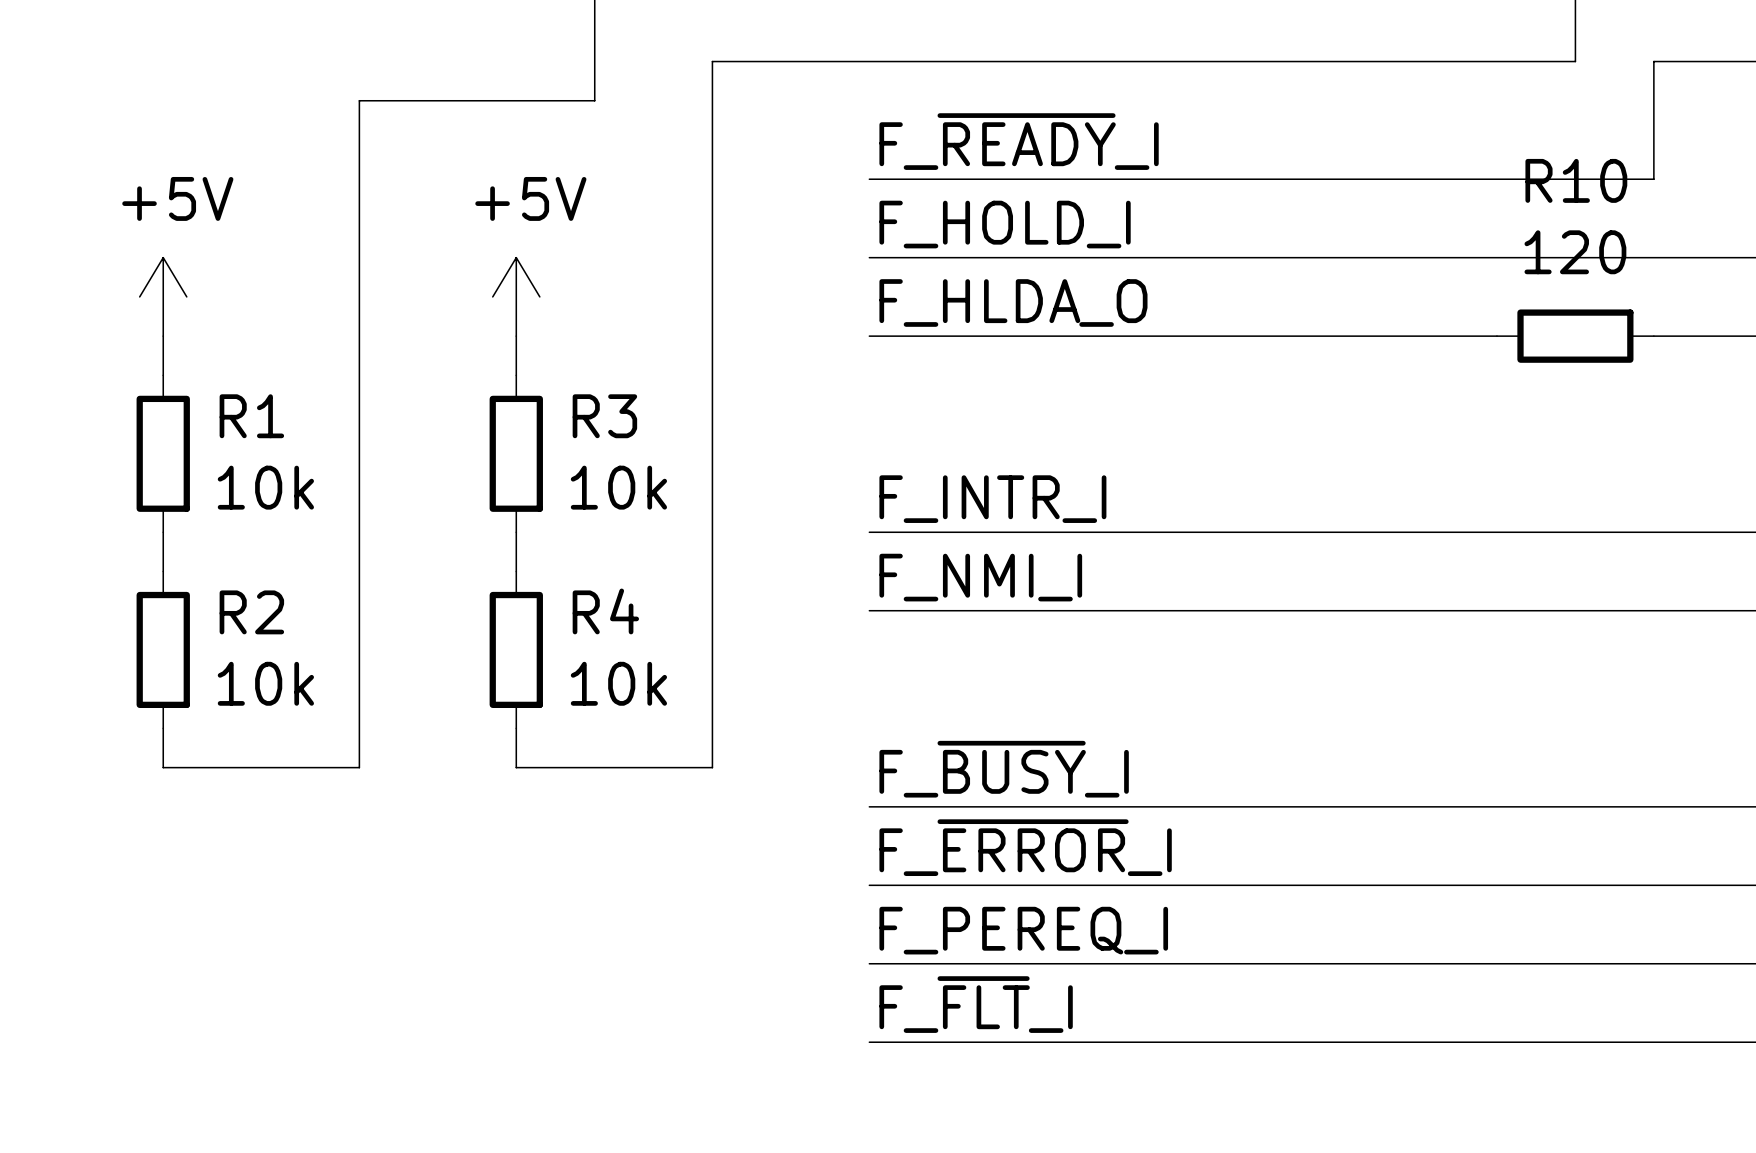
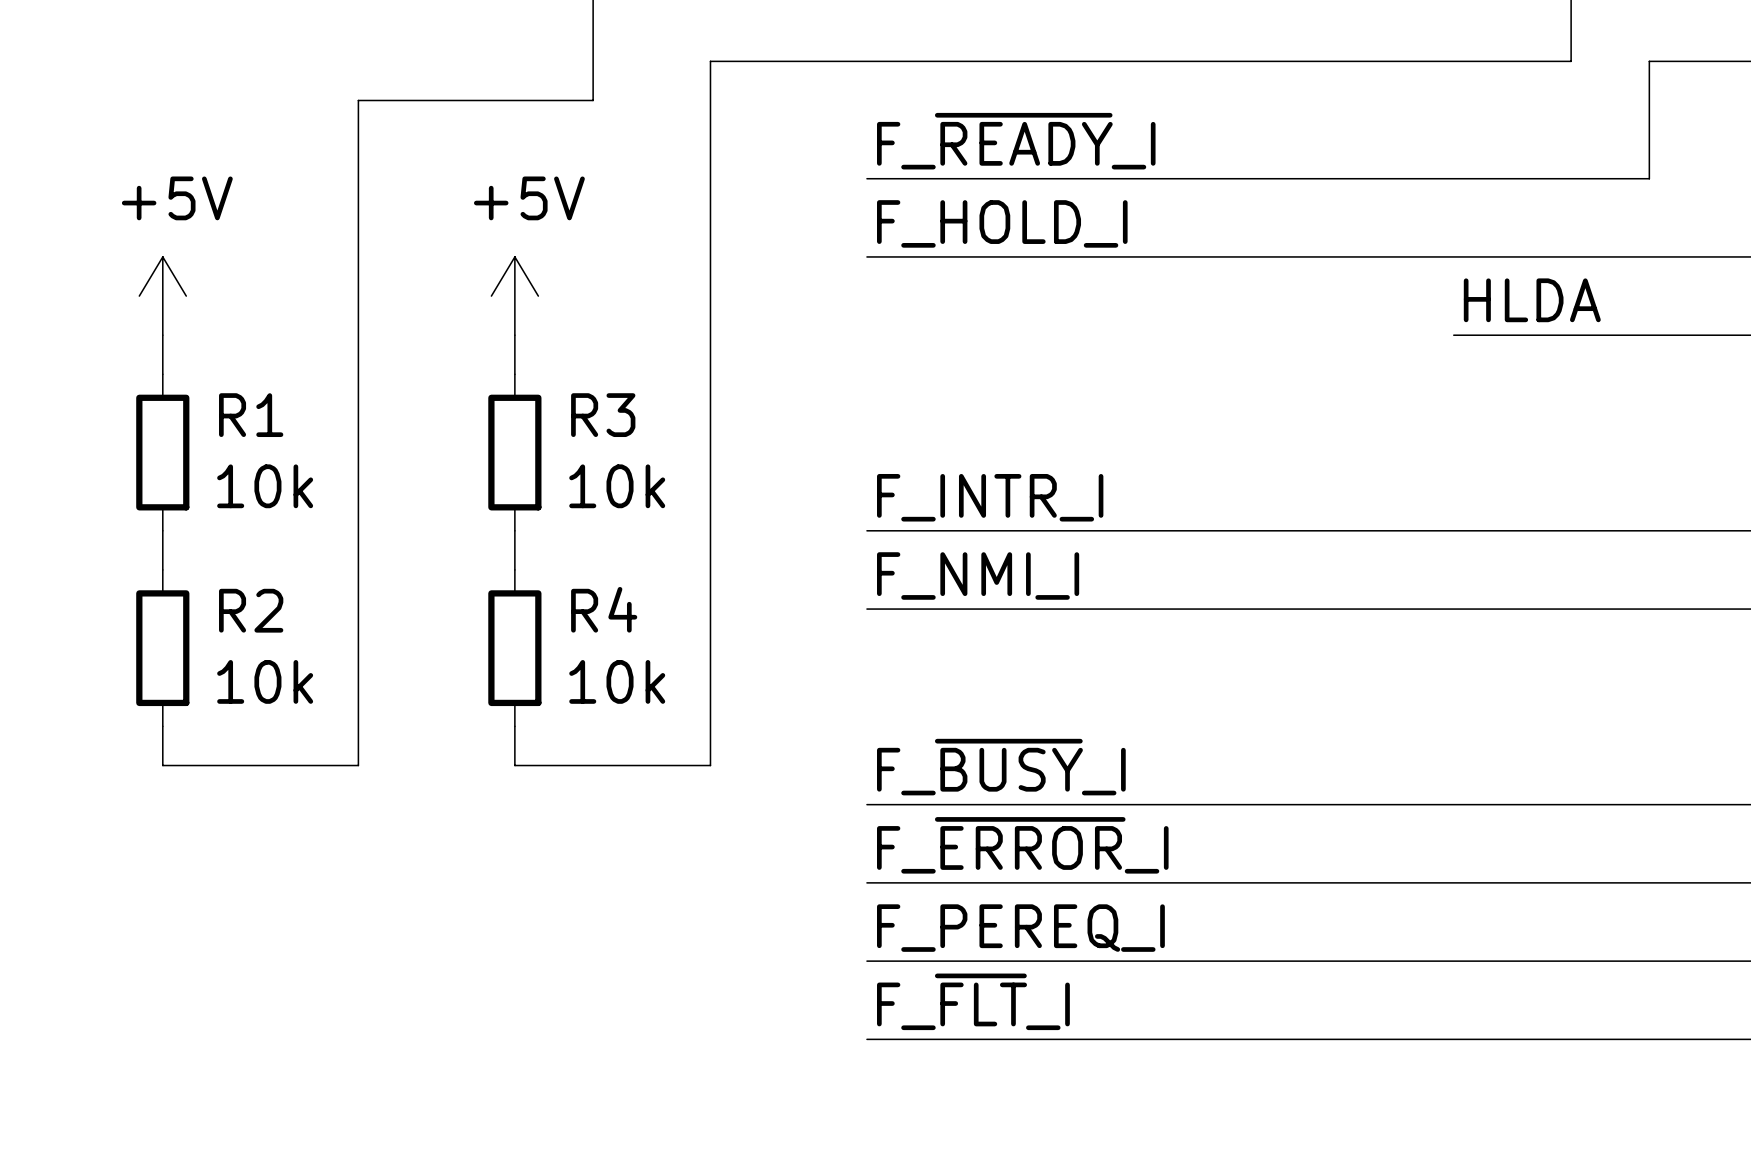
label: none -> HLDA (1532, 300)
label: F_HLDA_O (1013, 302) -> none
wire: (869, 336) (1457, 336) -> none
wire: none -> (1492, 335) (1649, 335)
R10: 120 (1575, 336) -> none

